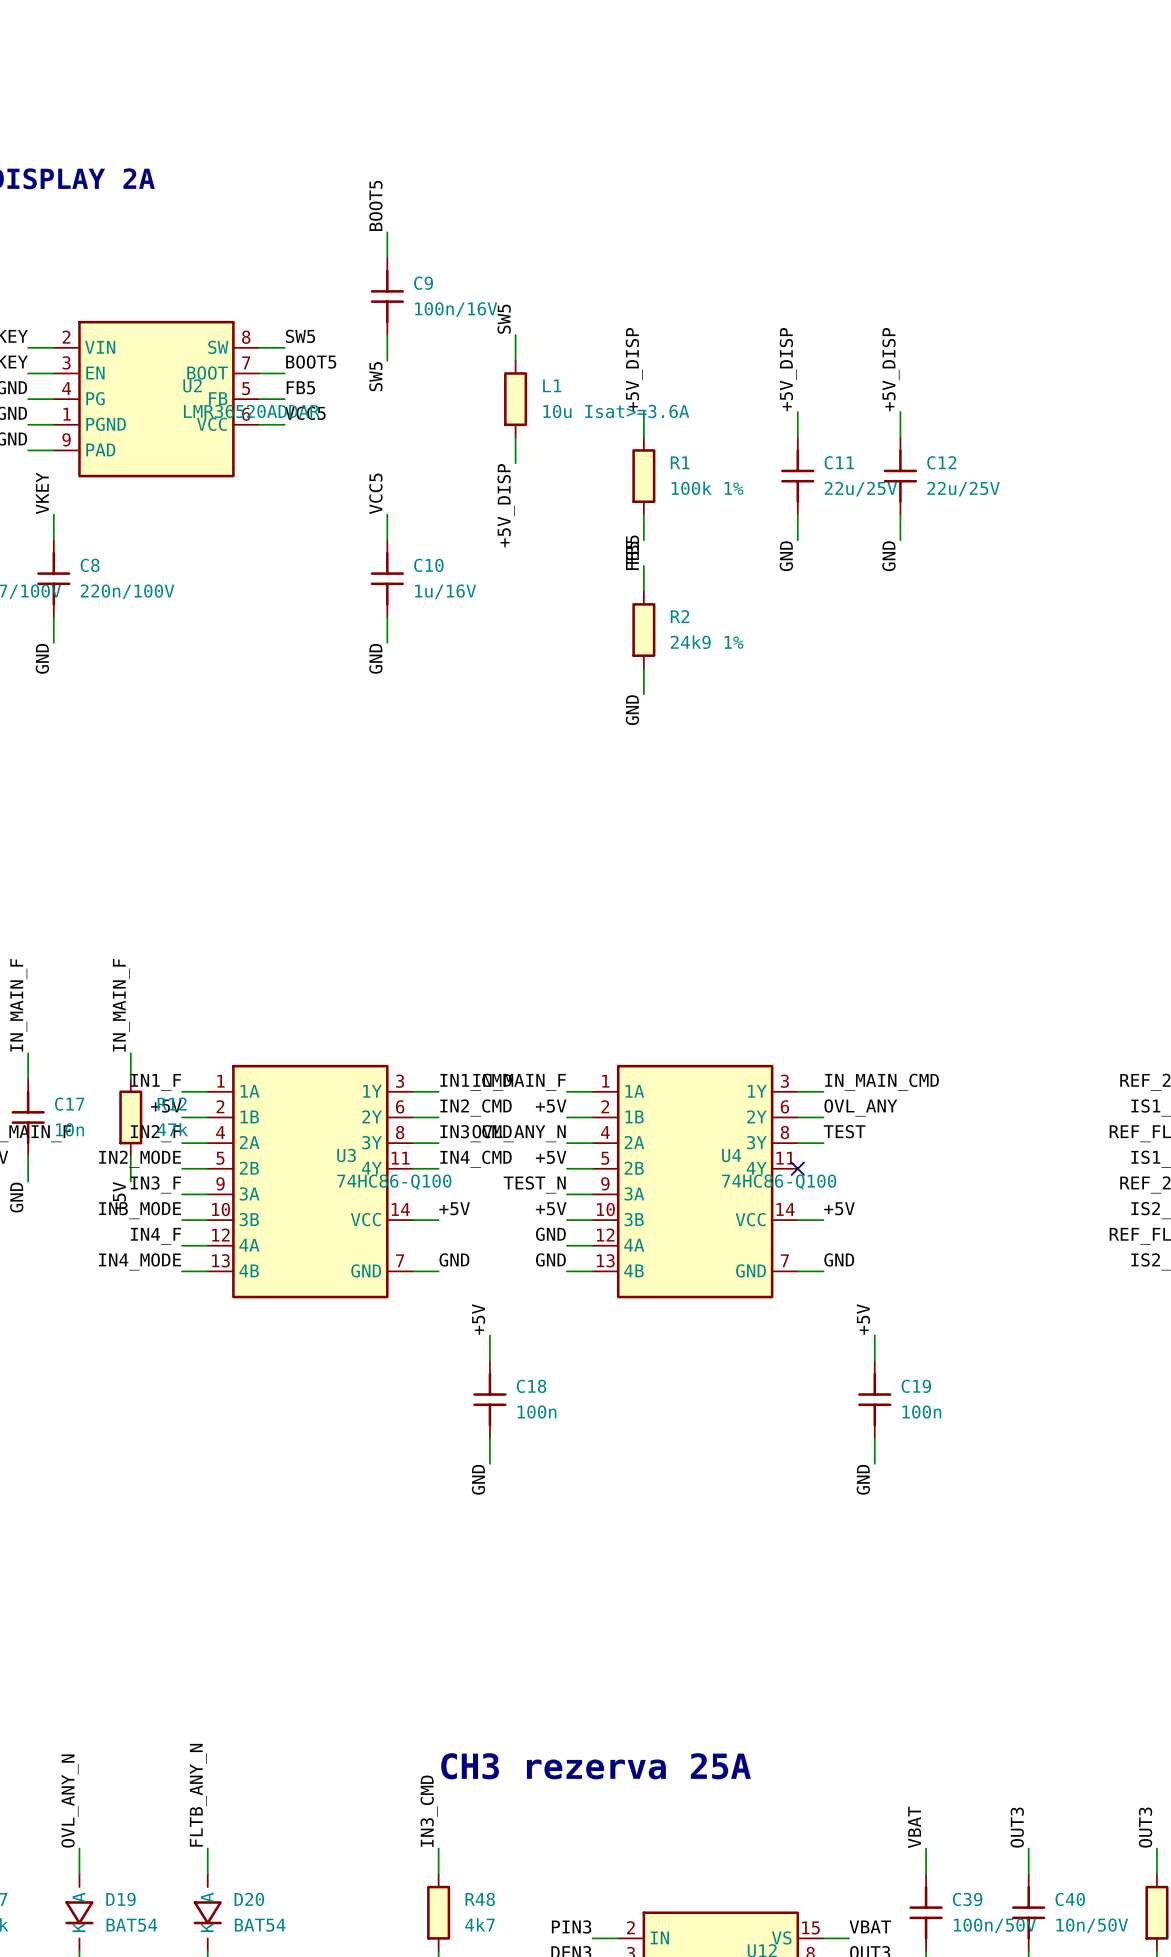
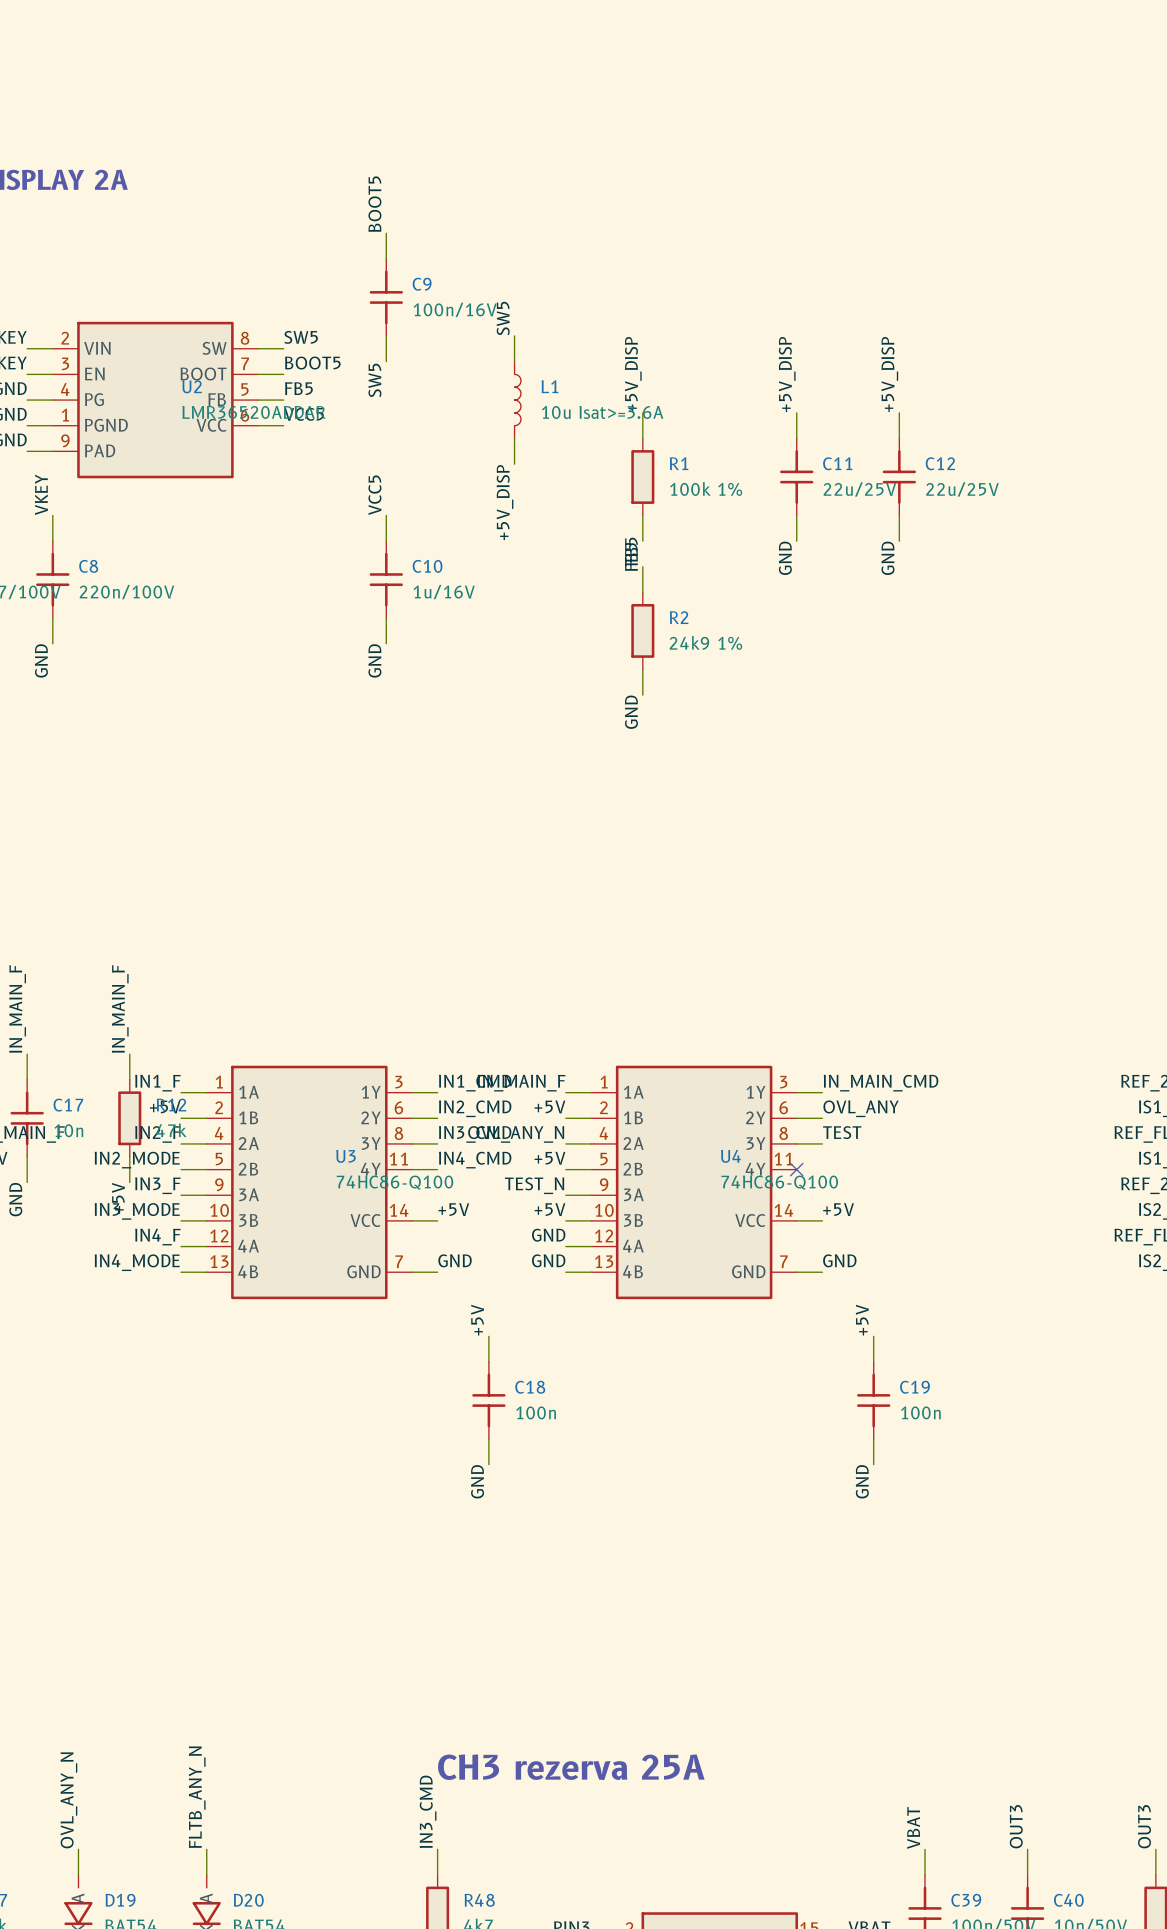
L1 symbol: [504, 360, 528, 438] -> [514, 361, 521, 439]

